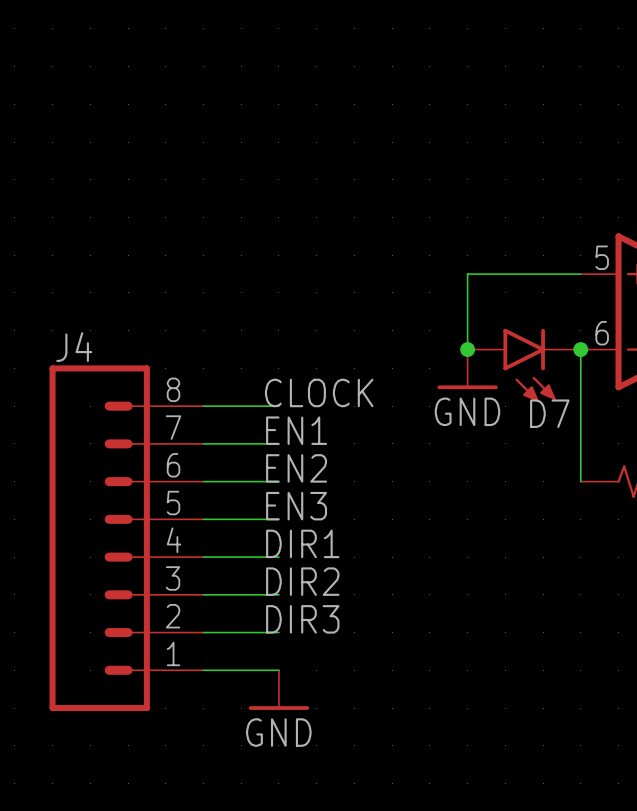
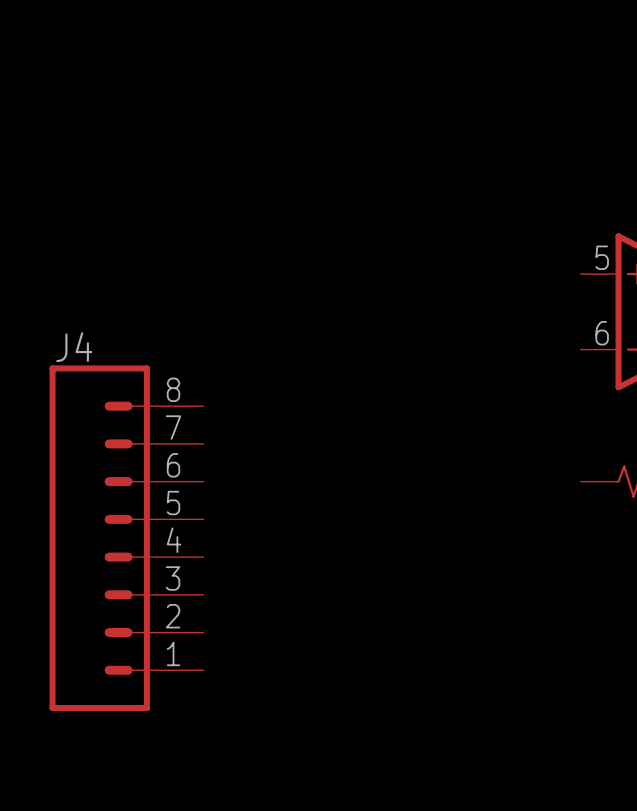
wire: (580, 274) (467, 274) (467, 349) -> none
junction: (467, 349) -> none
wire: (580, 349) (580, 481) -> none
junction: (580, 349) -> none
D7: (524, 365) -> none
power symbol: GND (467, 369) -> none
label: CLOCK (319, 392) -> none
wire: (203, 406) (278, 406) -> none
label: EN1 (296, 430) -> none
wire: (203, 443) (278, 443) -> none
label: EN2 (296, 468) -> none
wire: (203, 481) (278, 481) -> none
label: EN3 (296, 506) -> none
wire: (203, 519) (278, 519) -> none
label: DIR1 (302, 543) -> none
wire: (203, 557) (278, 557) -> none
label: DIR2 (302, 581) -> none
wire: (203, 594) (278, 594) -> none
label: DIR3 (302, 619) -> none
wire: (203, 632) (278, 632) -> none
wire: (203, 670) (278, 670) -> none
power symbol: GND (278, 690) -> none

